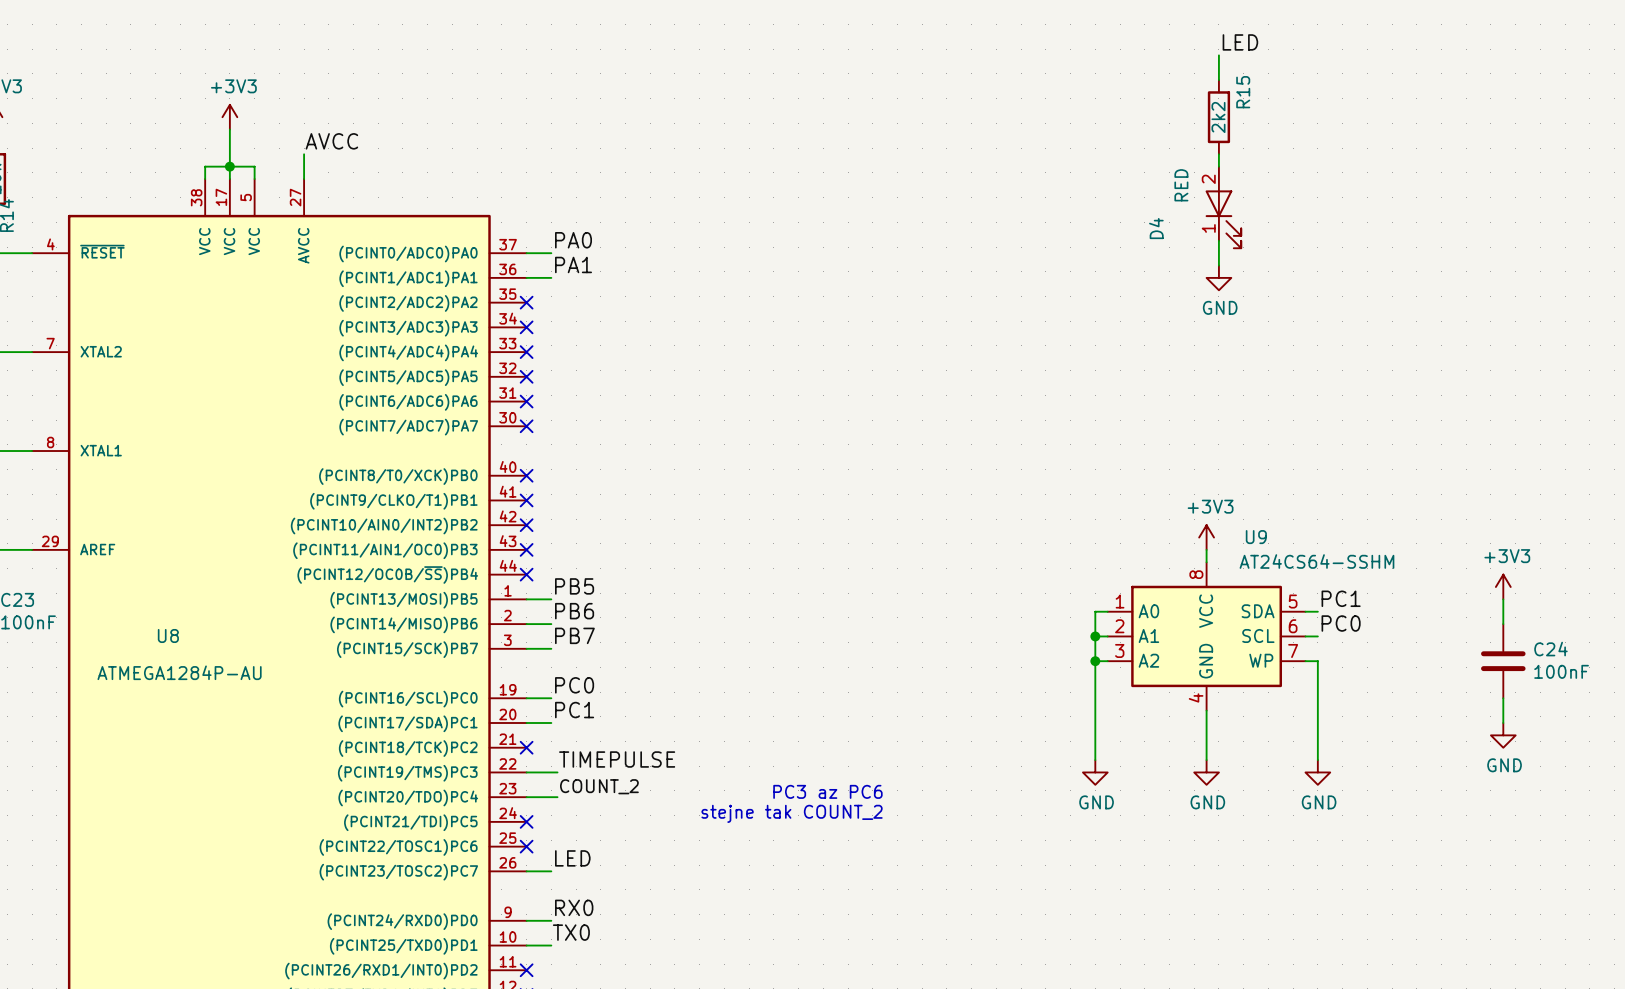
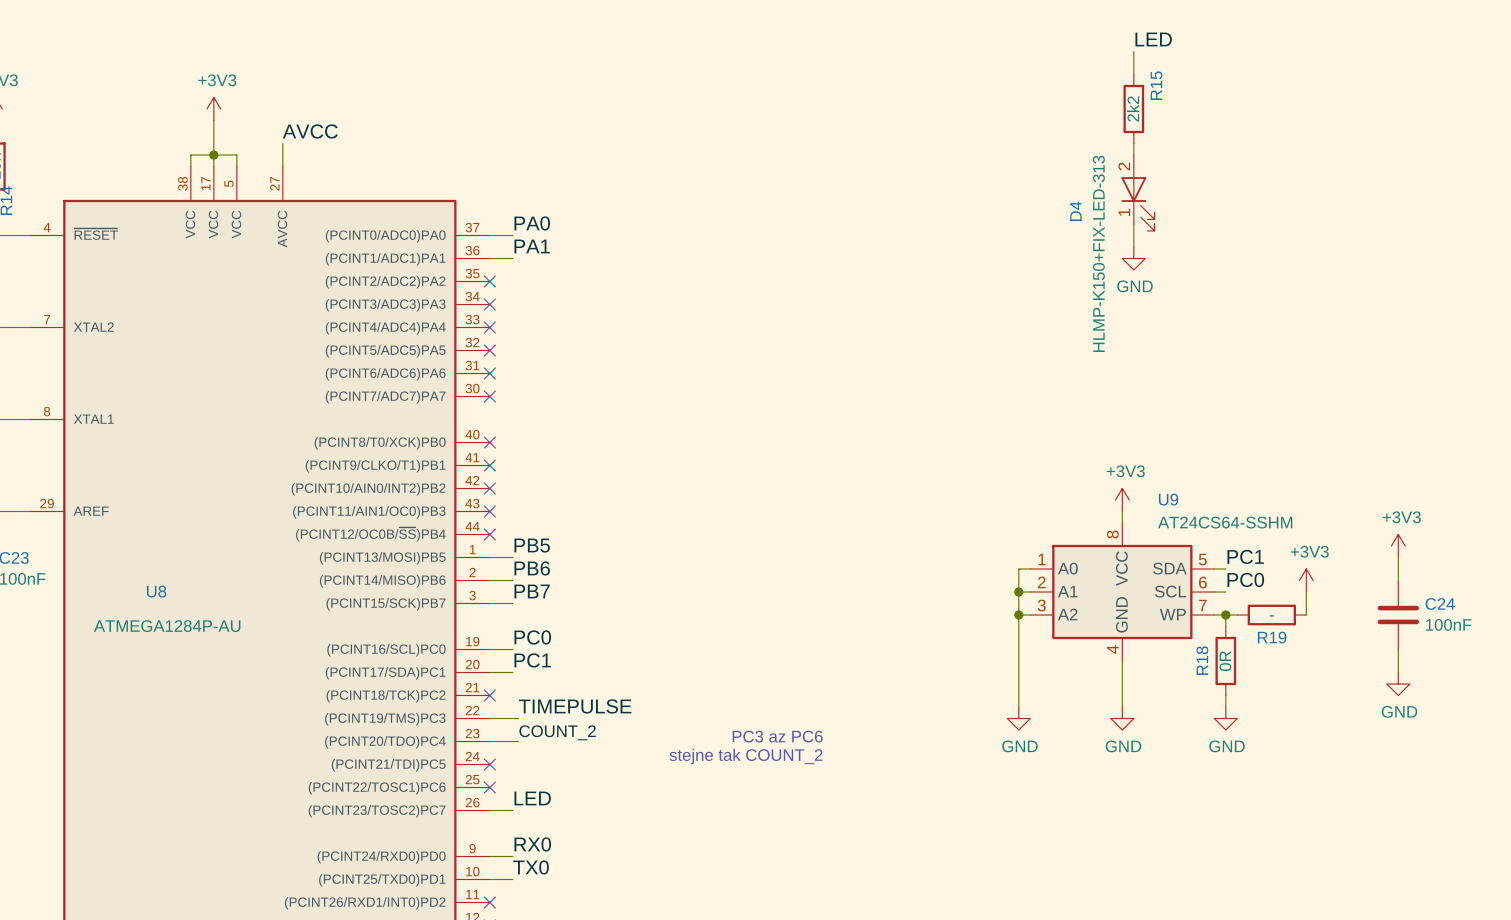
D4 value: RED (1181, 185) -> HLMP-K150+FIX-LED-313 (1098, 253)
power symbol: none -> +3V3 (1306, 580)
wire: none -> (1306, 592) (1306, 615)
wire: none -> (1225, 615) (1237, 615)
junction: none -> (1225, 615)
R19: none -> - (1271, 615)
wire: (1317, 673) (1317, 747) -> none
R18: none -> 0R (1225, 661)

